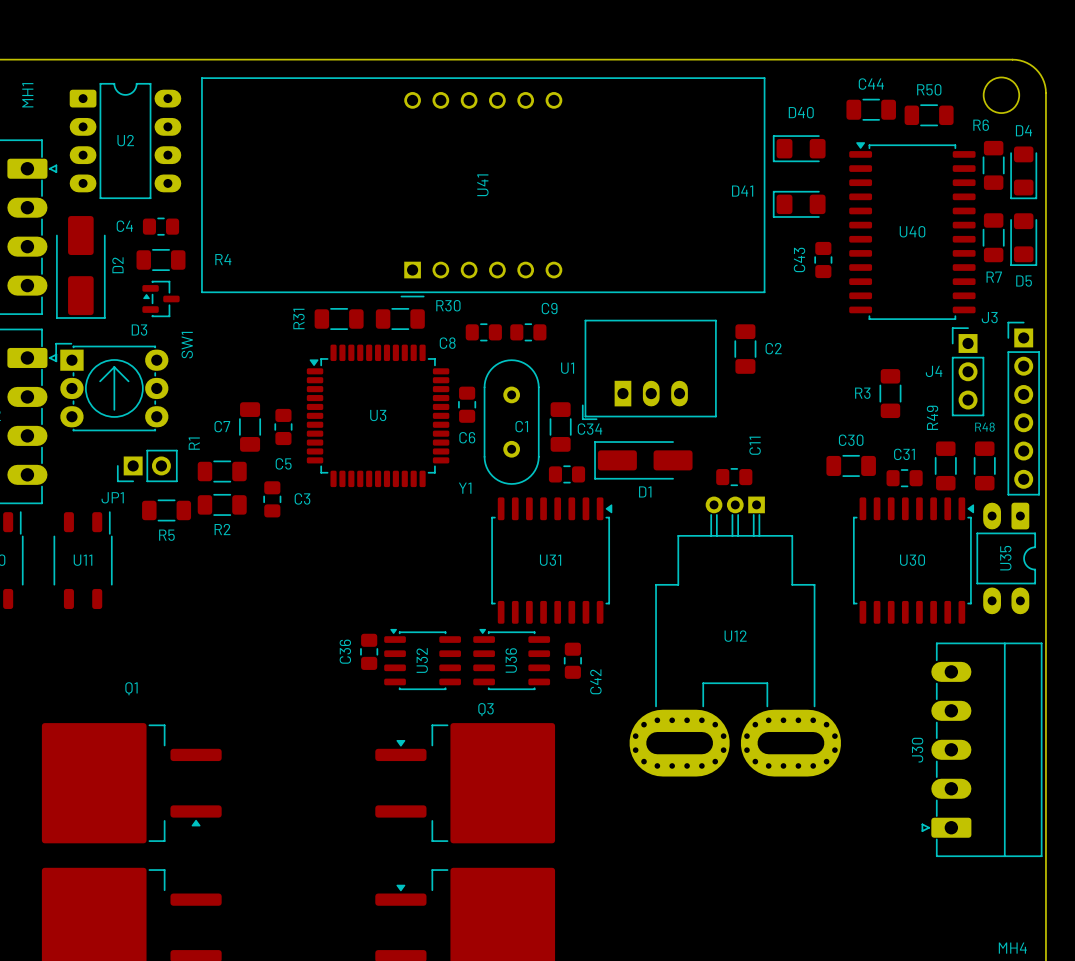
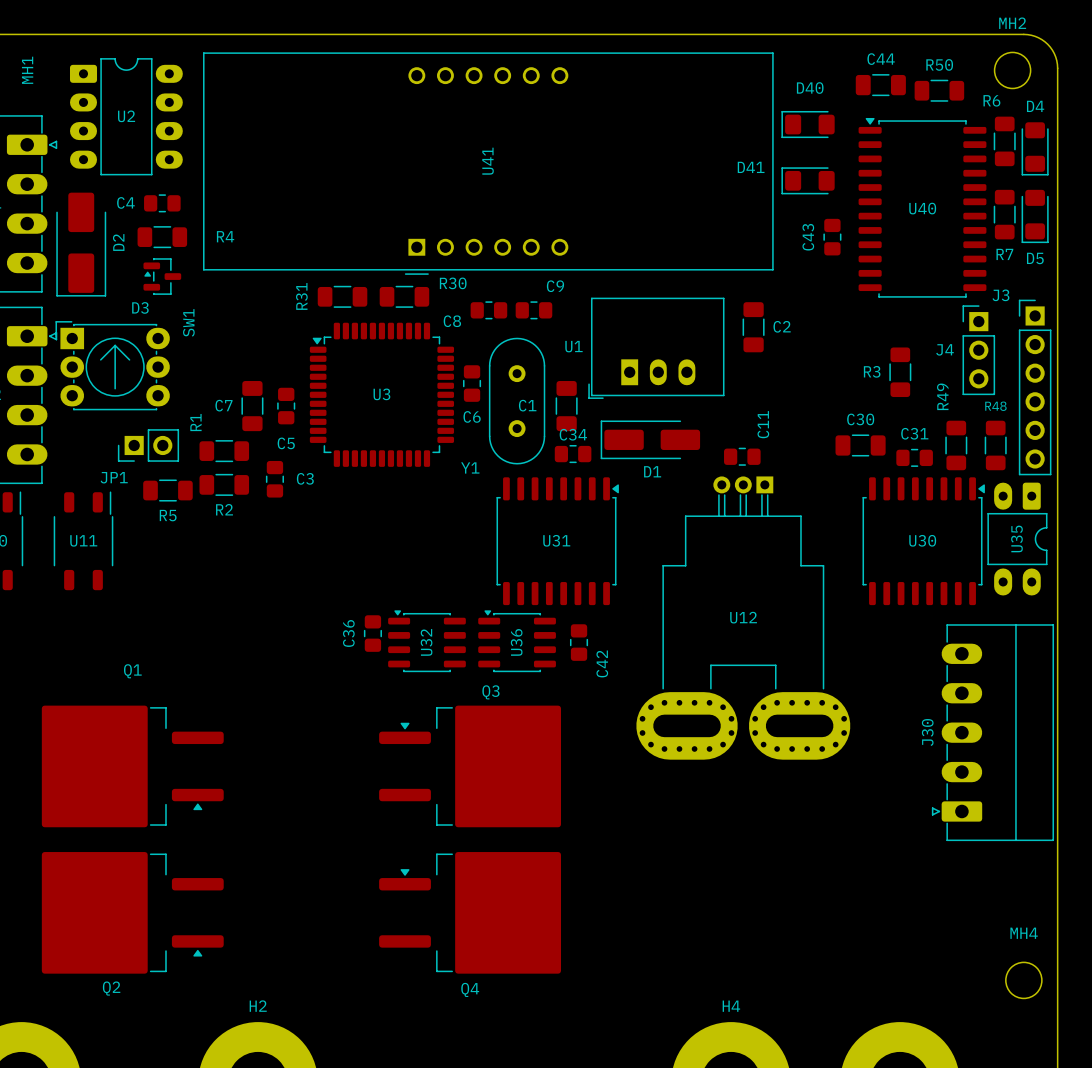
MH2 name: none -> MH2 (1012, 23)
C34 name position: C34 (589, 429) -> C34 (573, 434)

